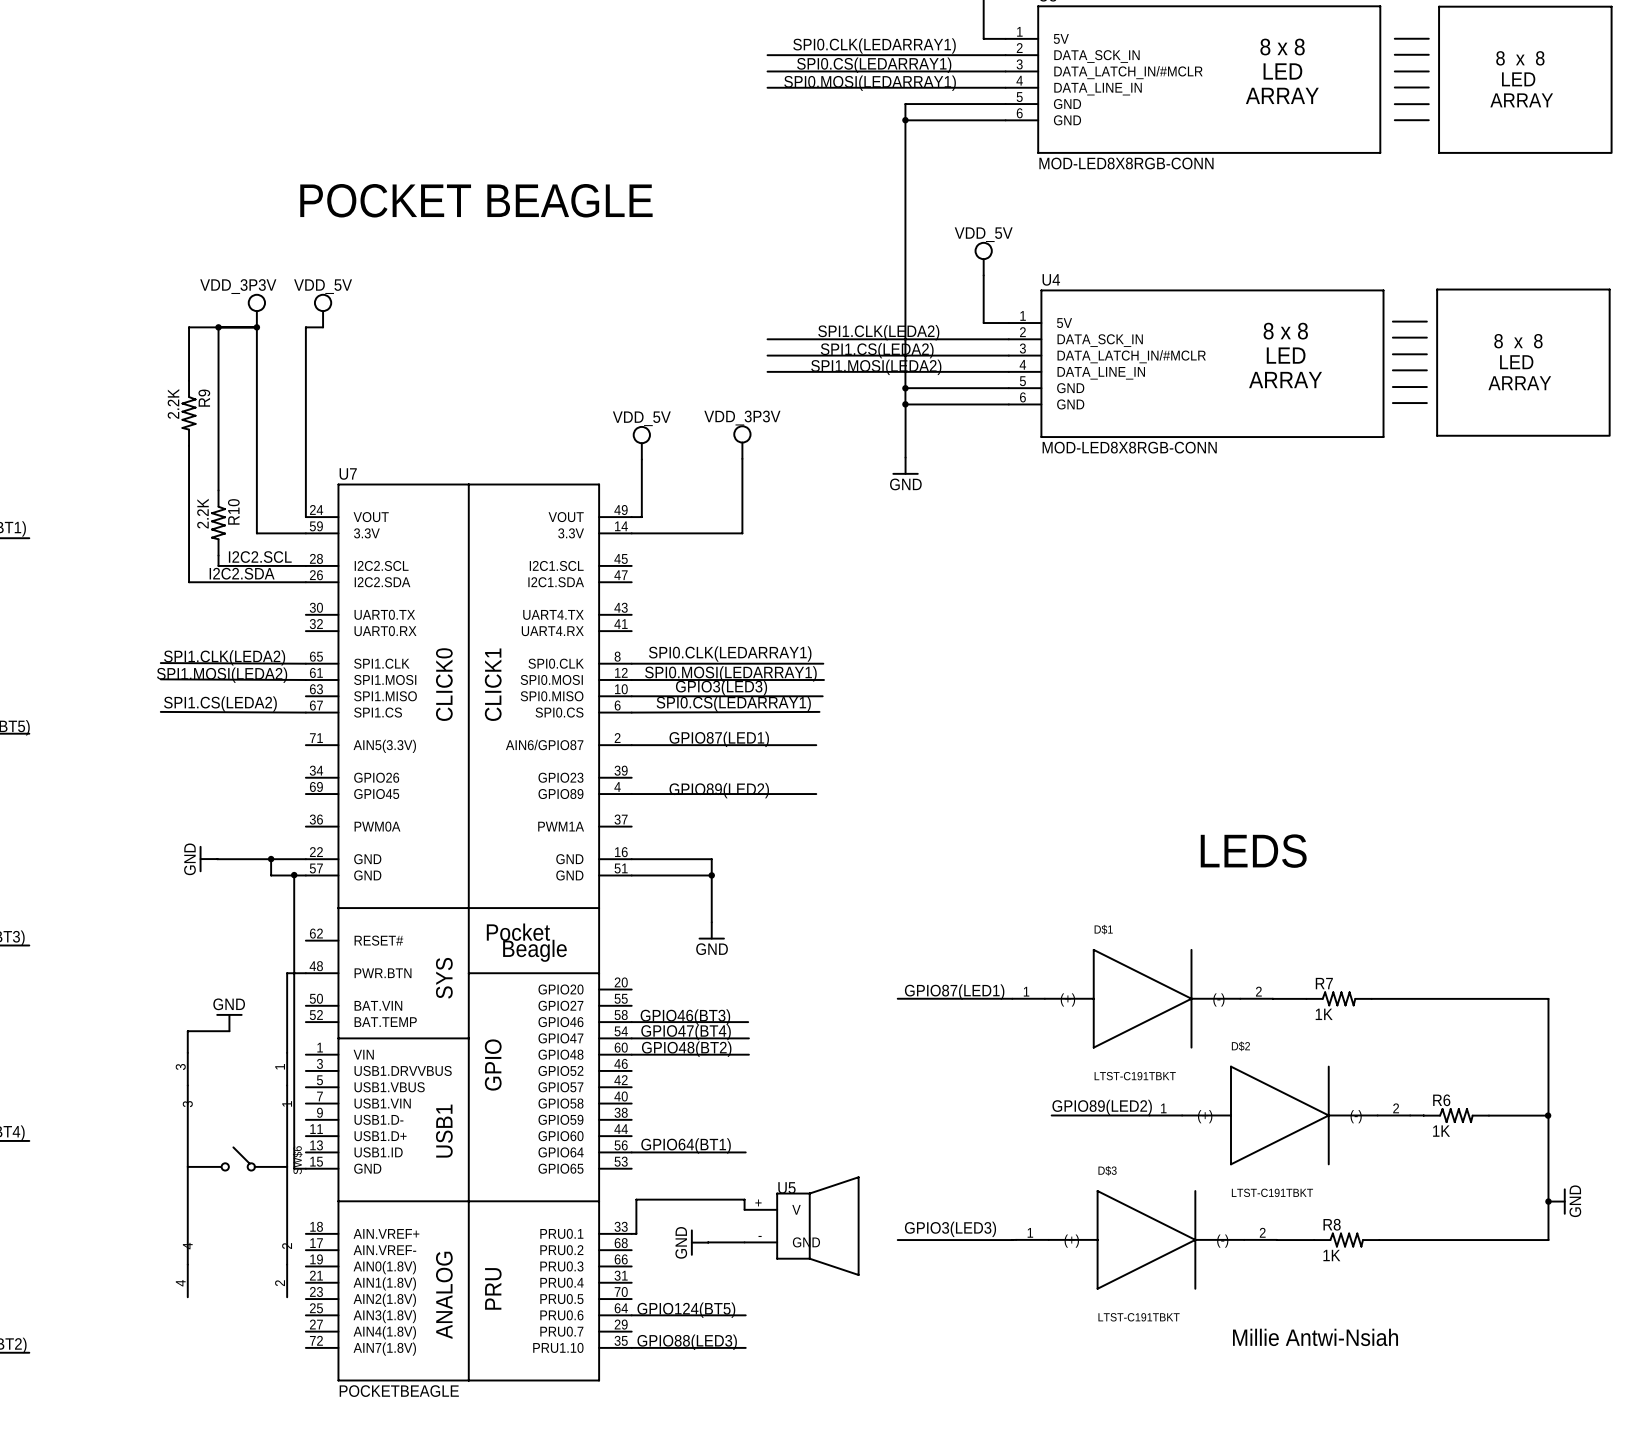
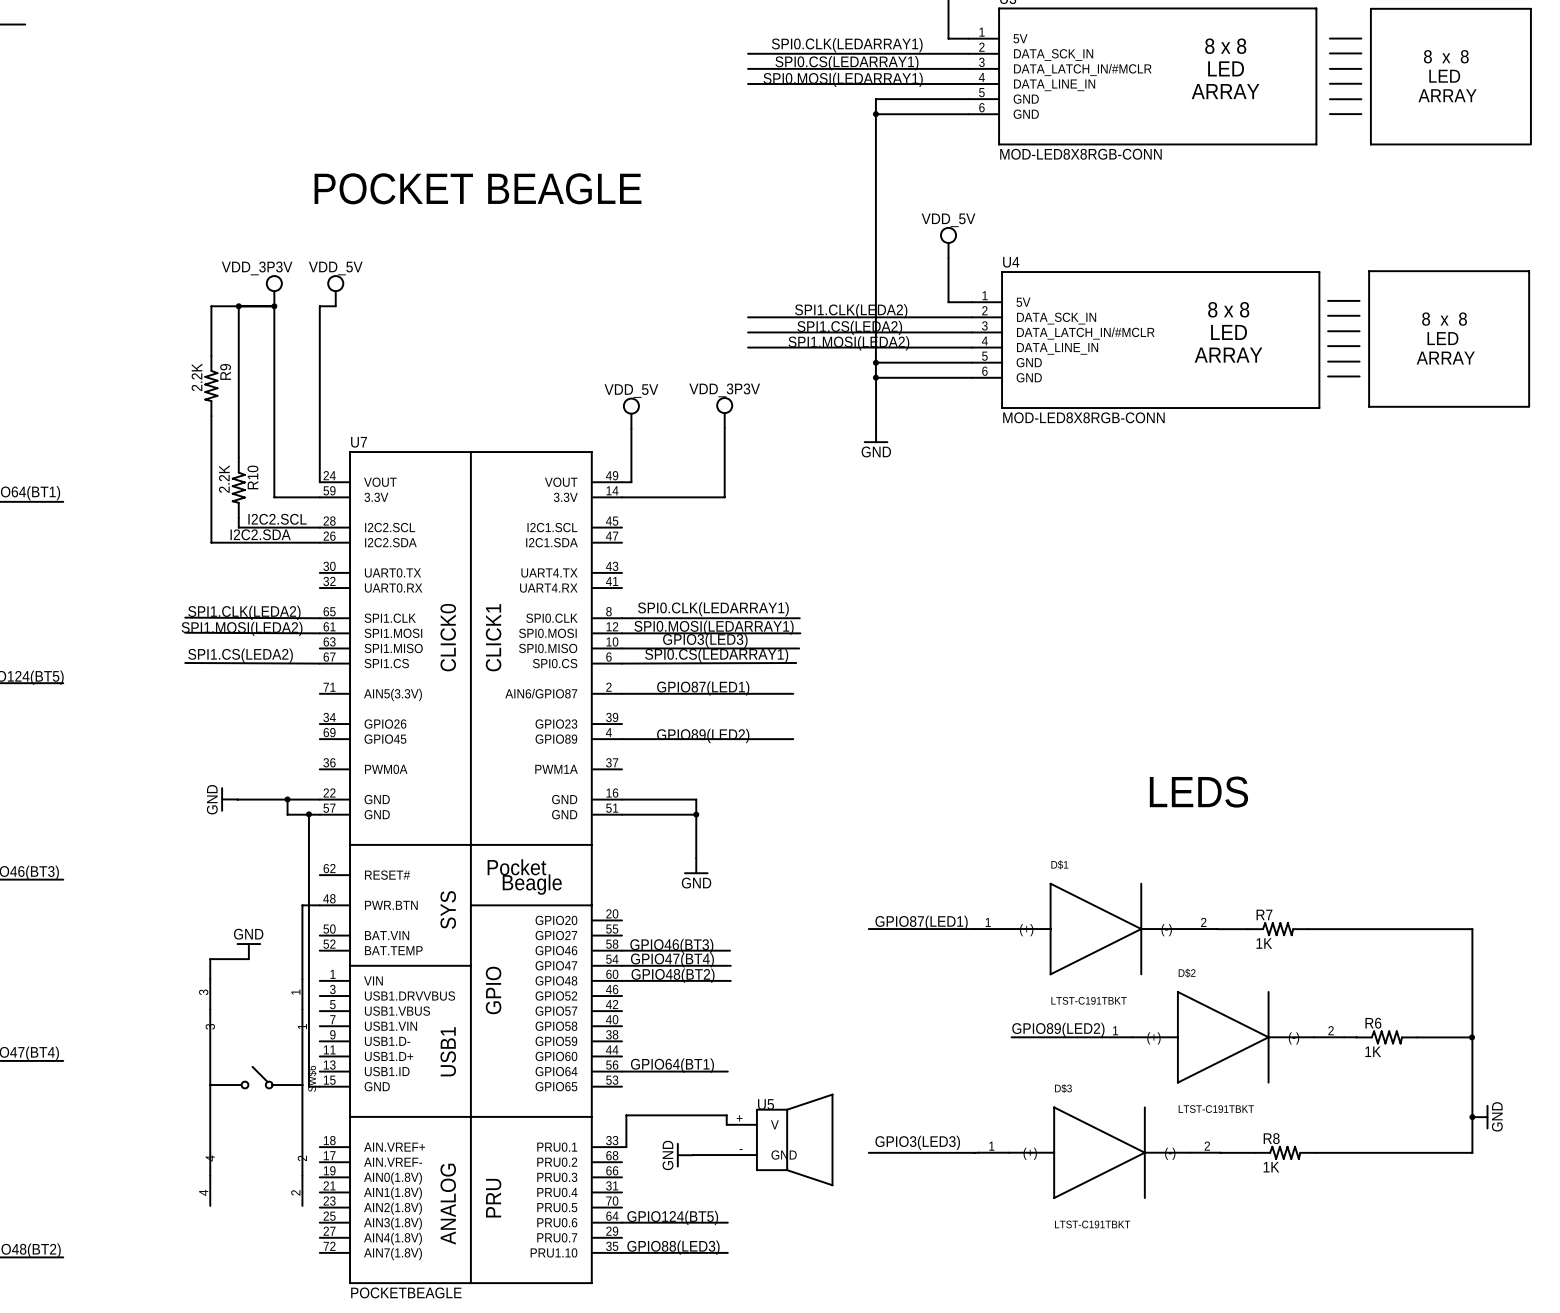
text: Millie Antwi-Nsiah (1315, 1337) -> none

